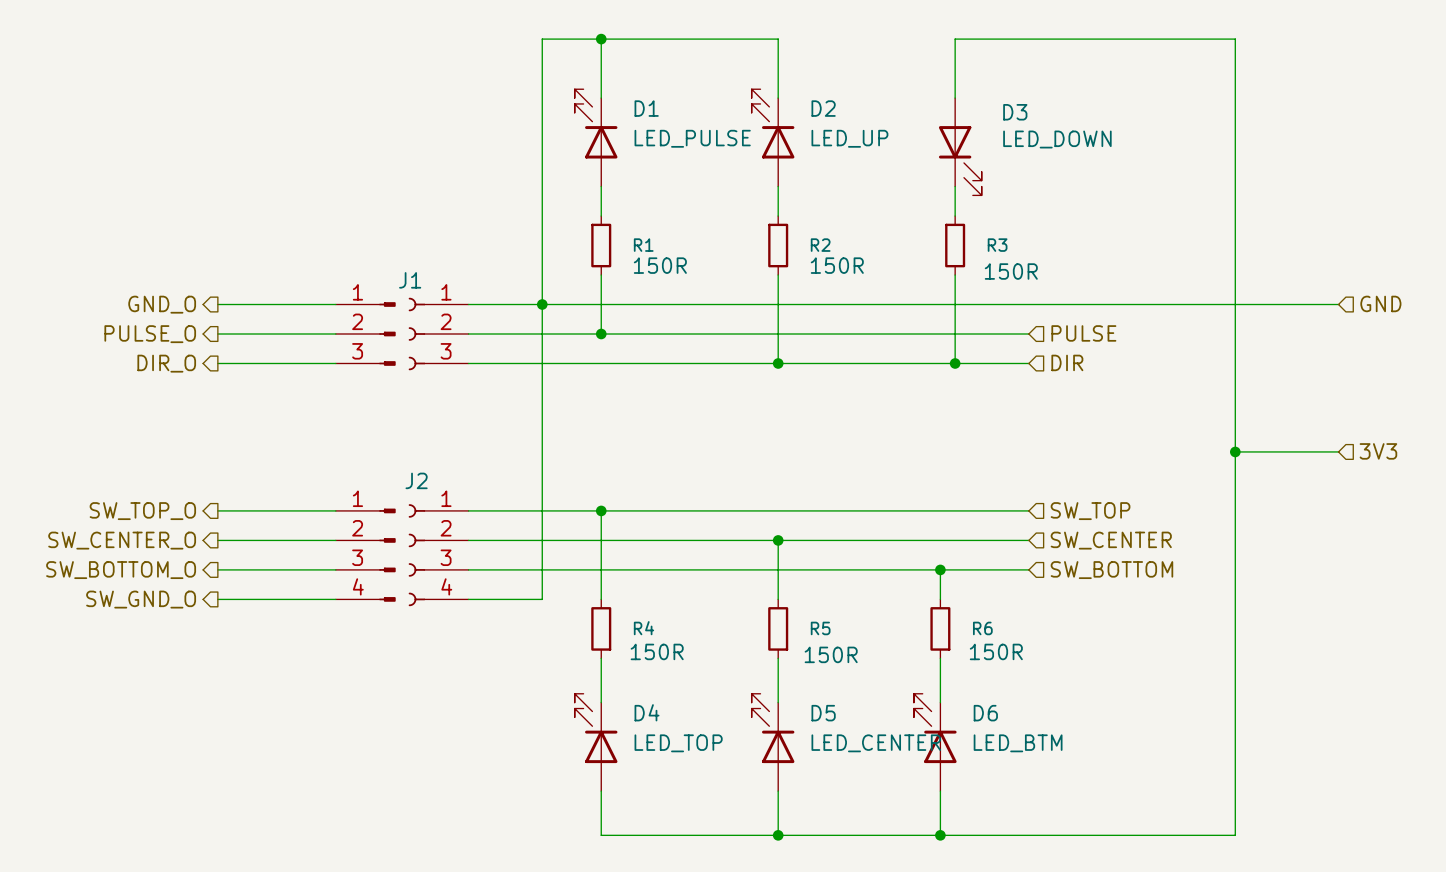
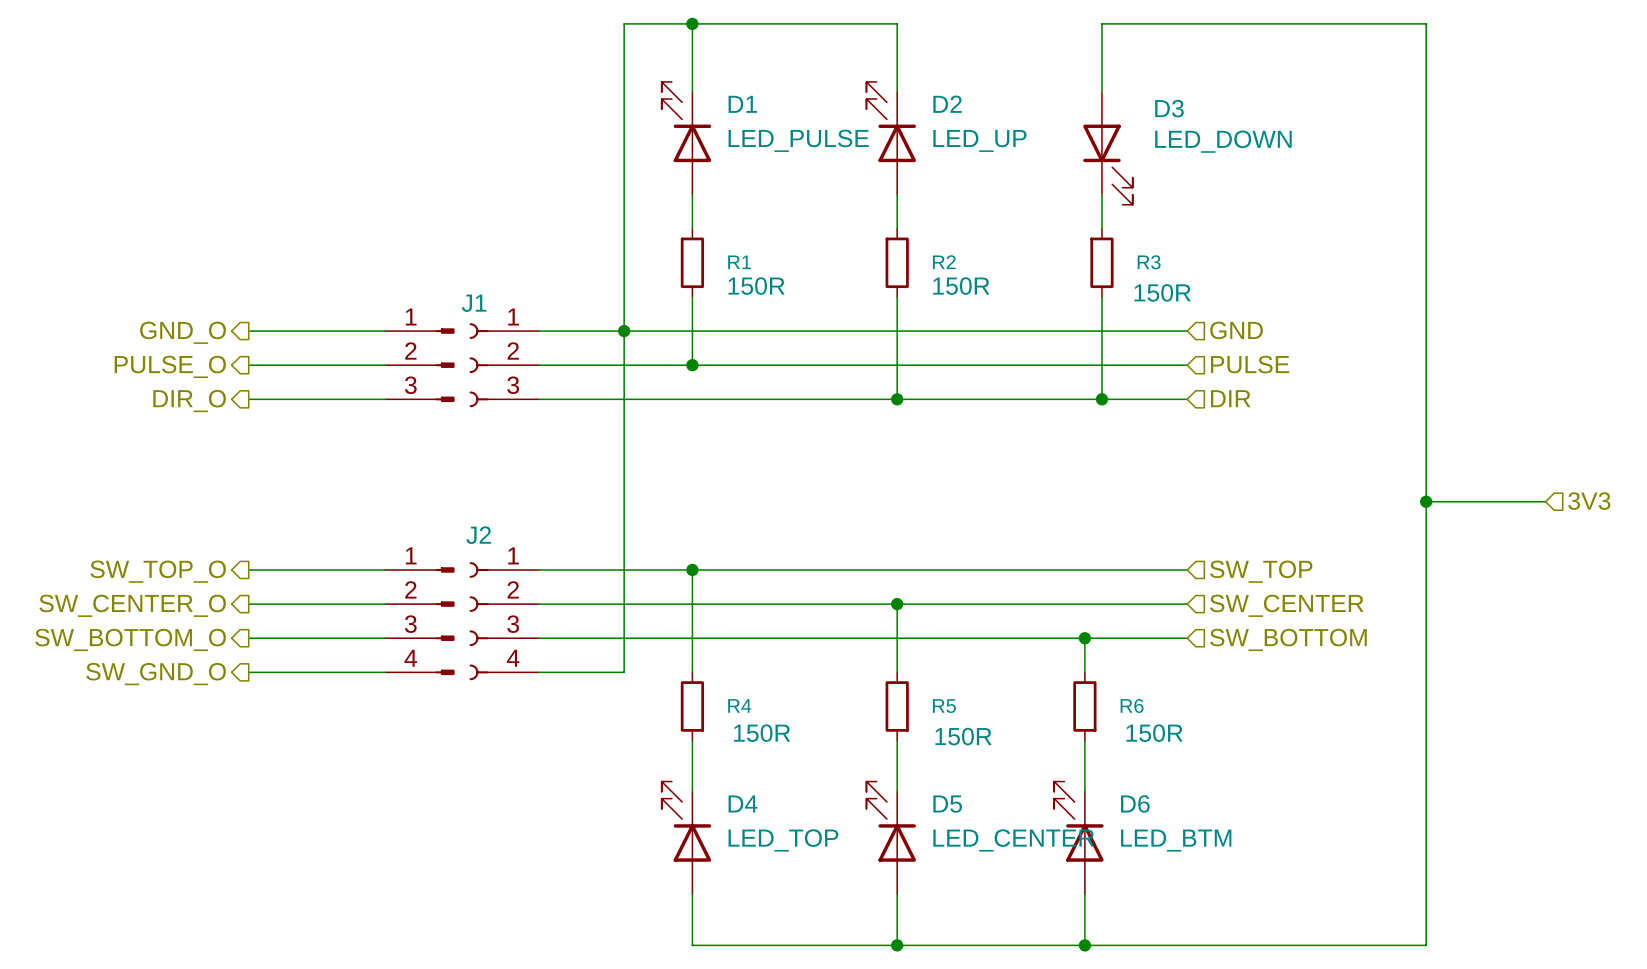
hierarchical label: none -> GND (1236, 330)
hierarchical label: GND (1380, 303) -> none
wire: (1028, 304) (1338, 304) -> none

